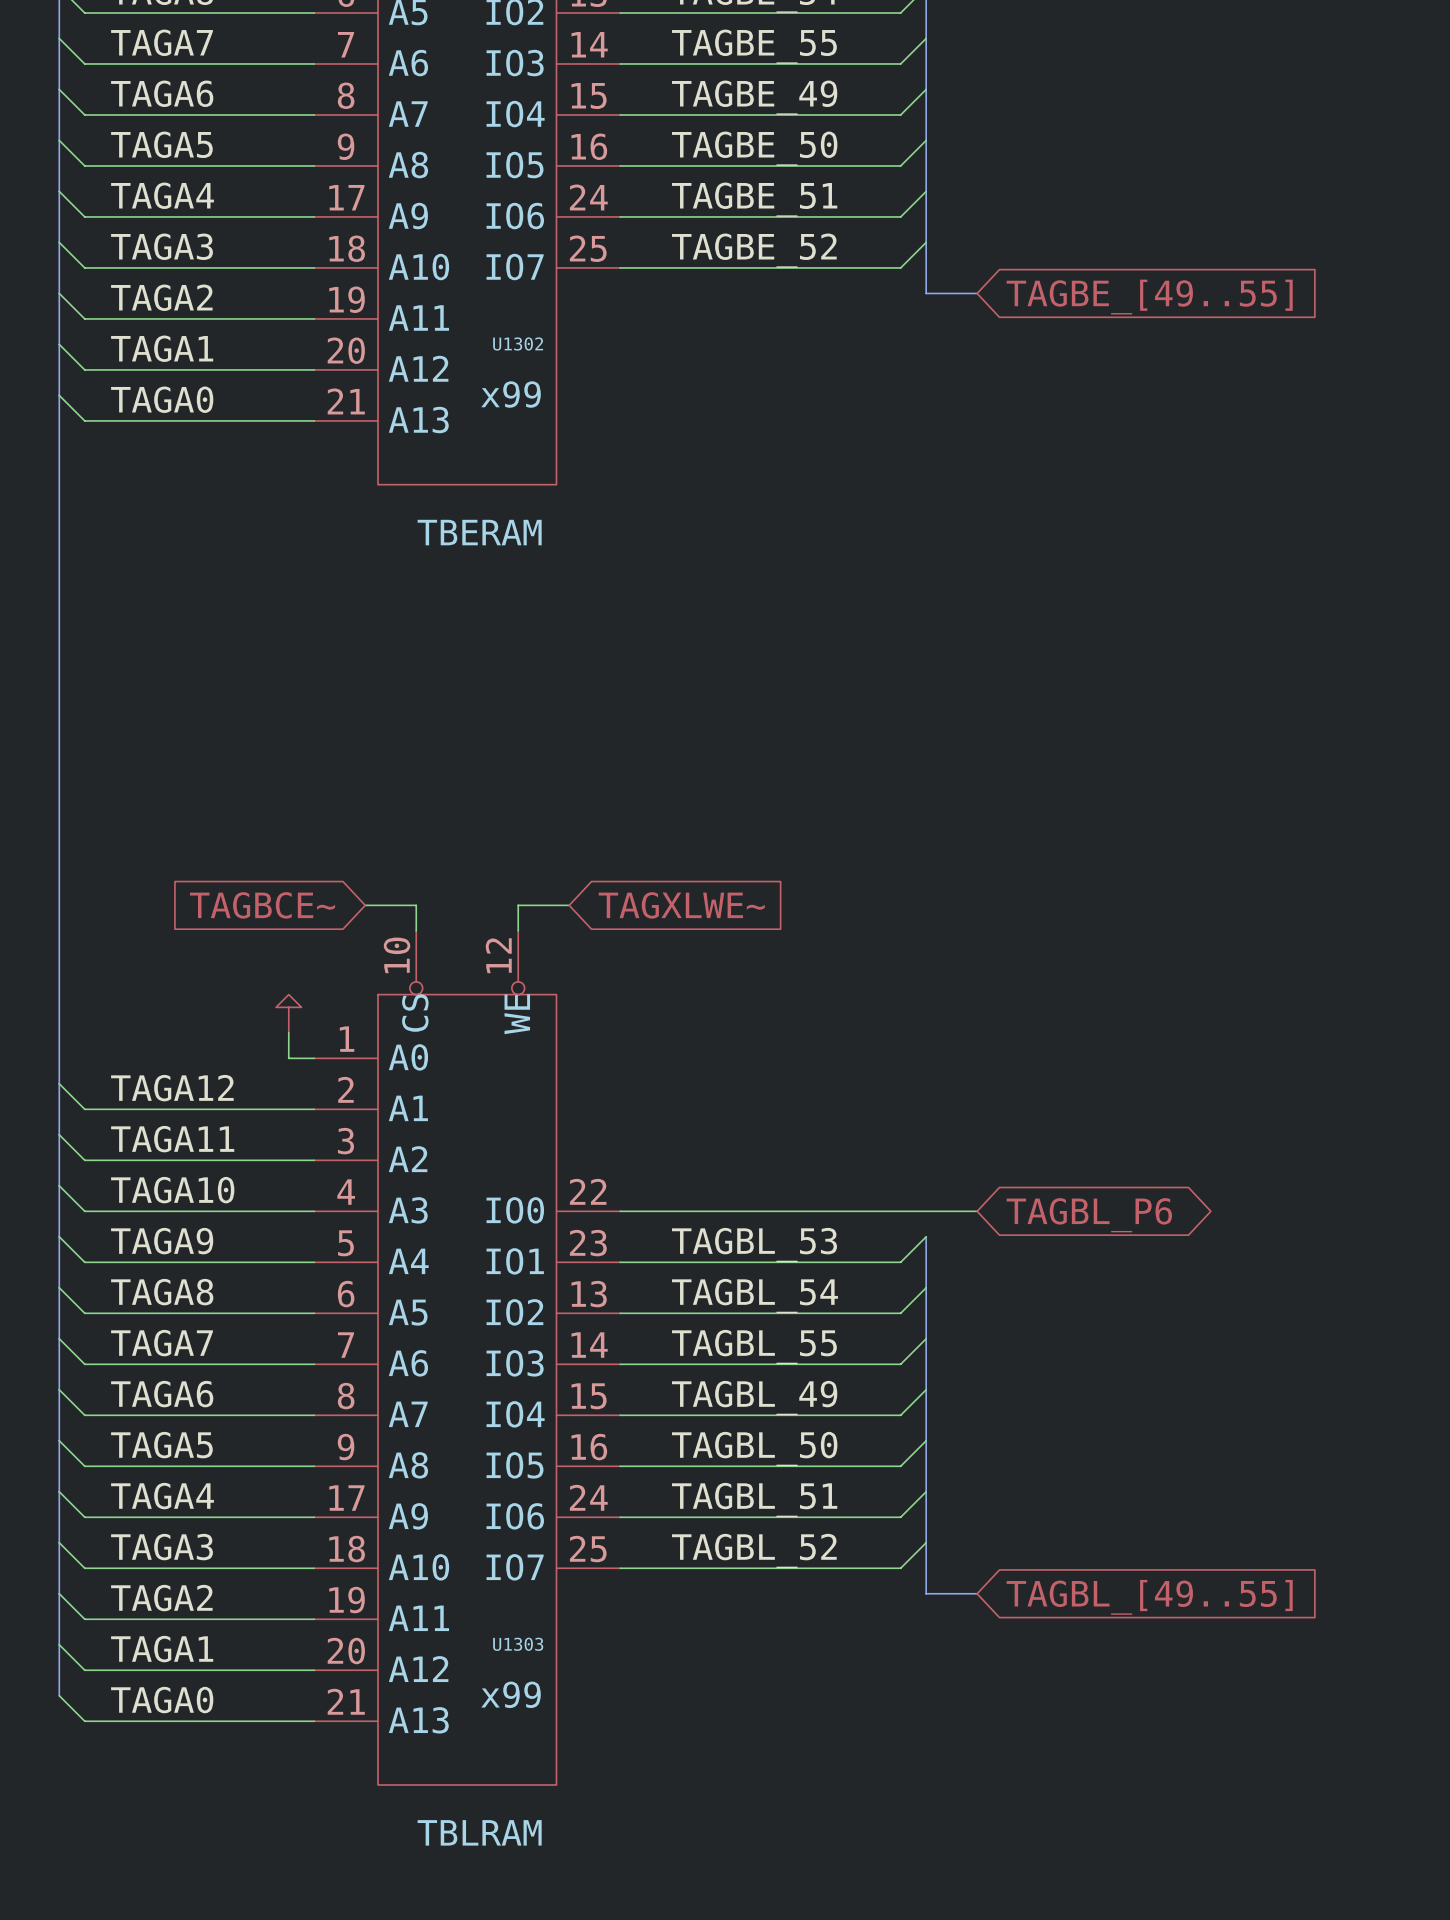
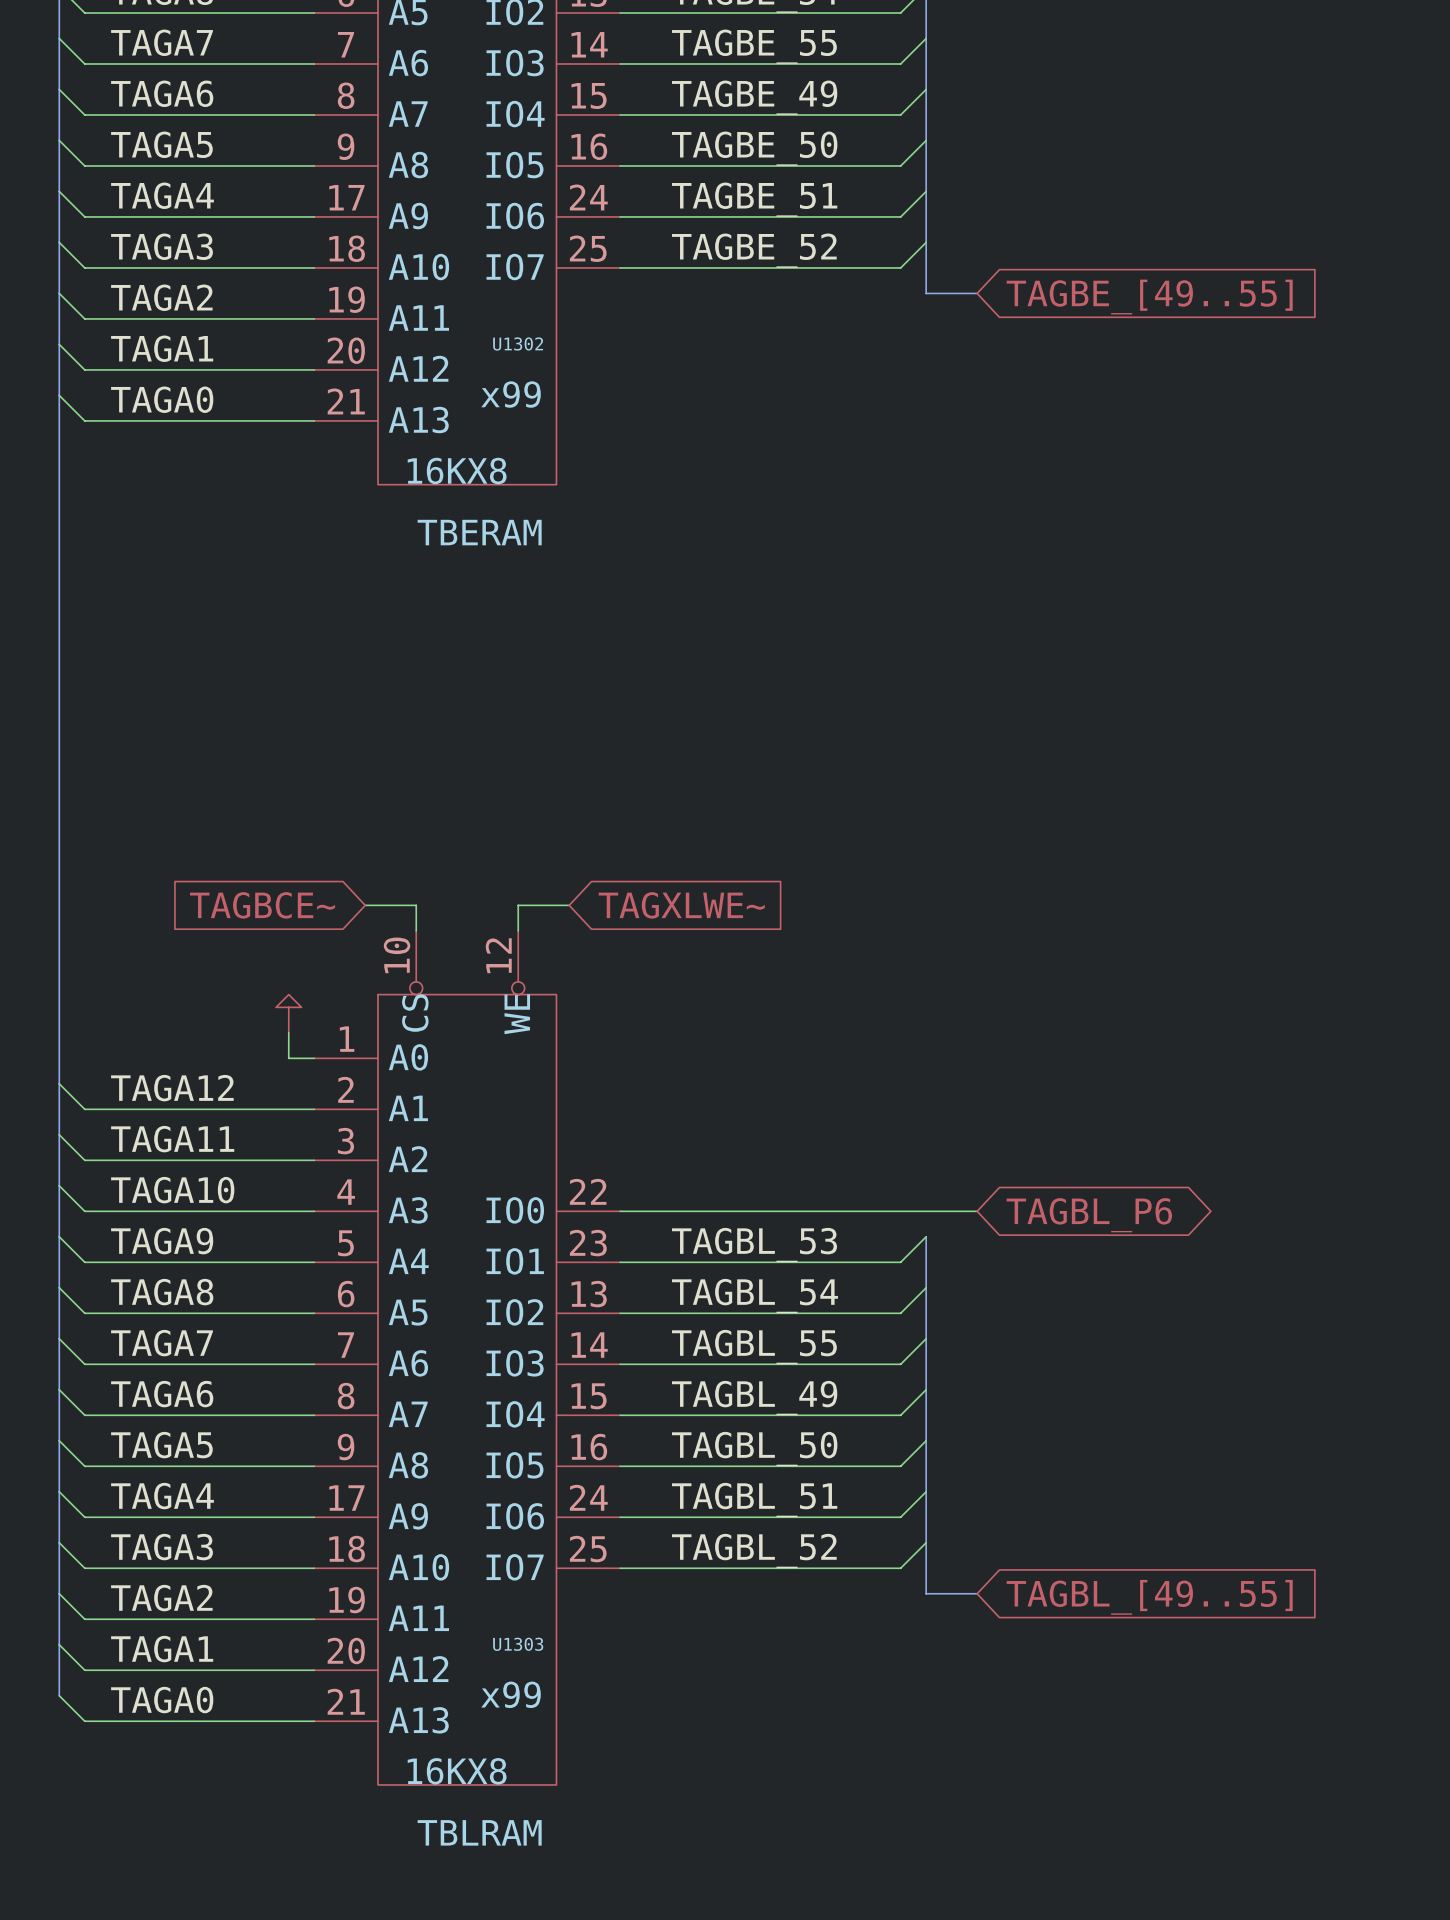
U1302 value: none -> 16KX8 (457, 471)
U1303 value: none -> 16KX8 (457, 1771)

